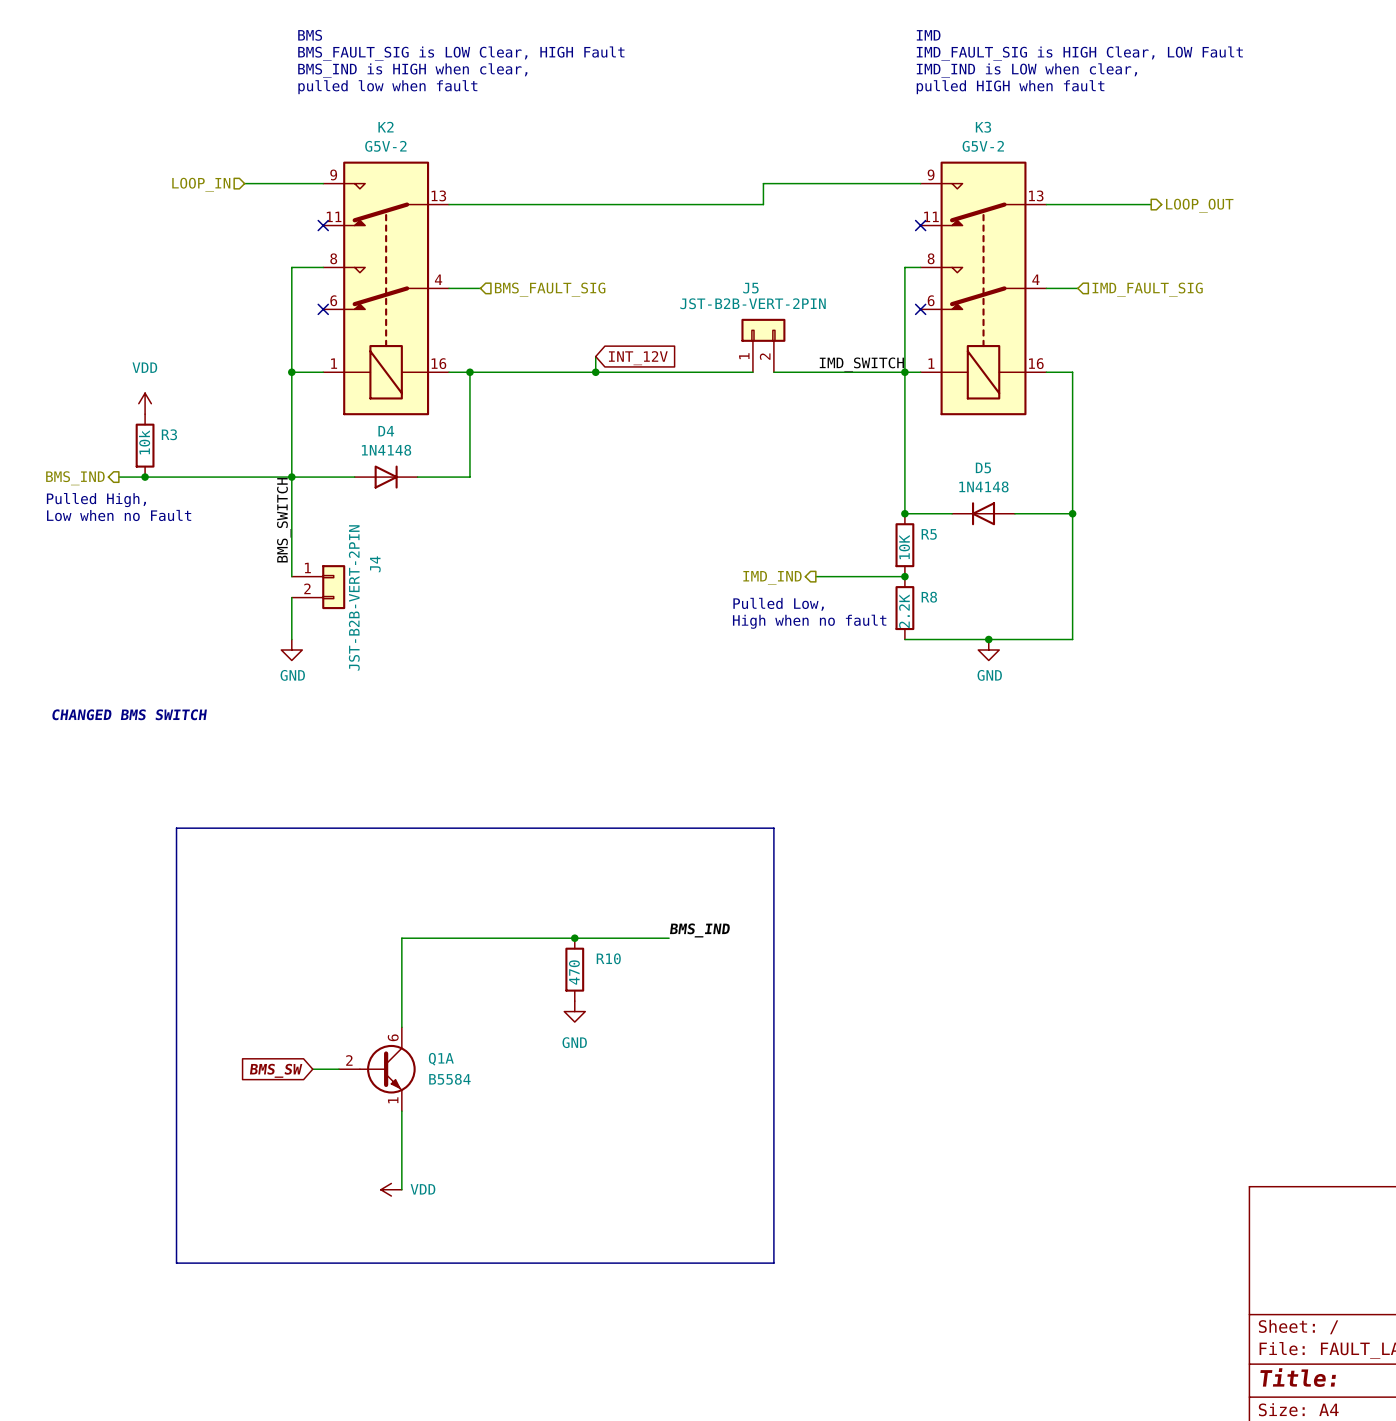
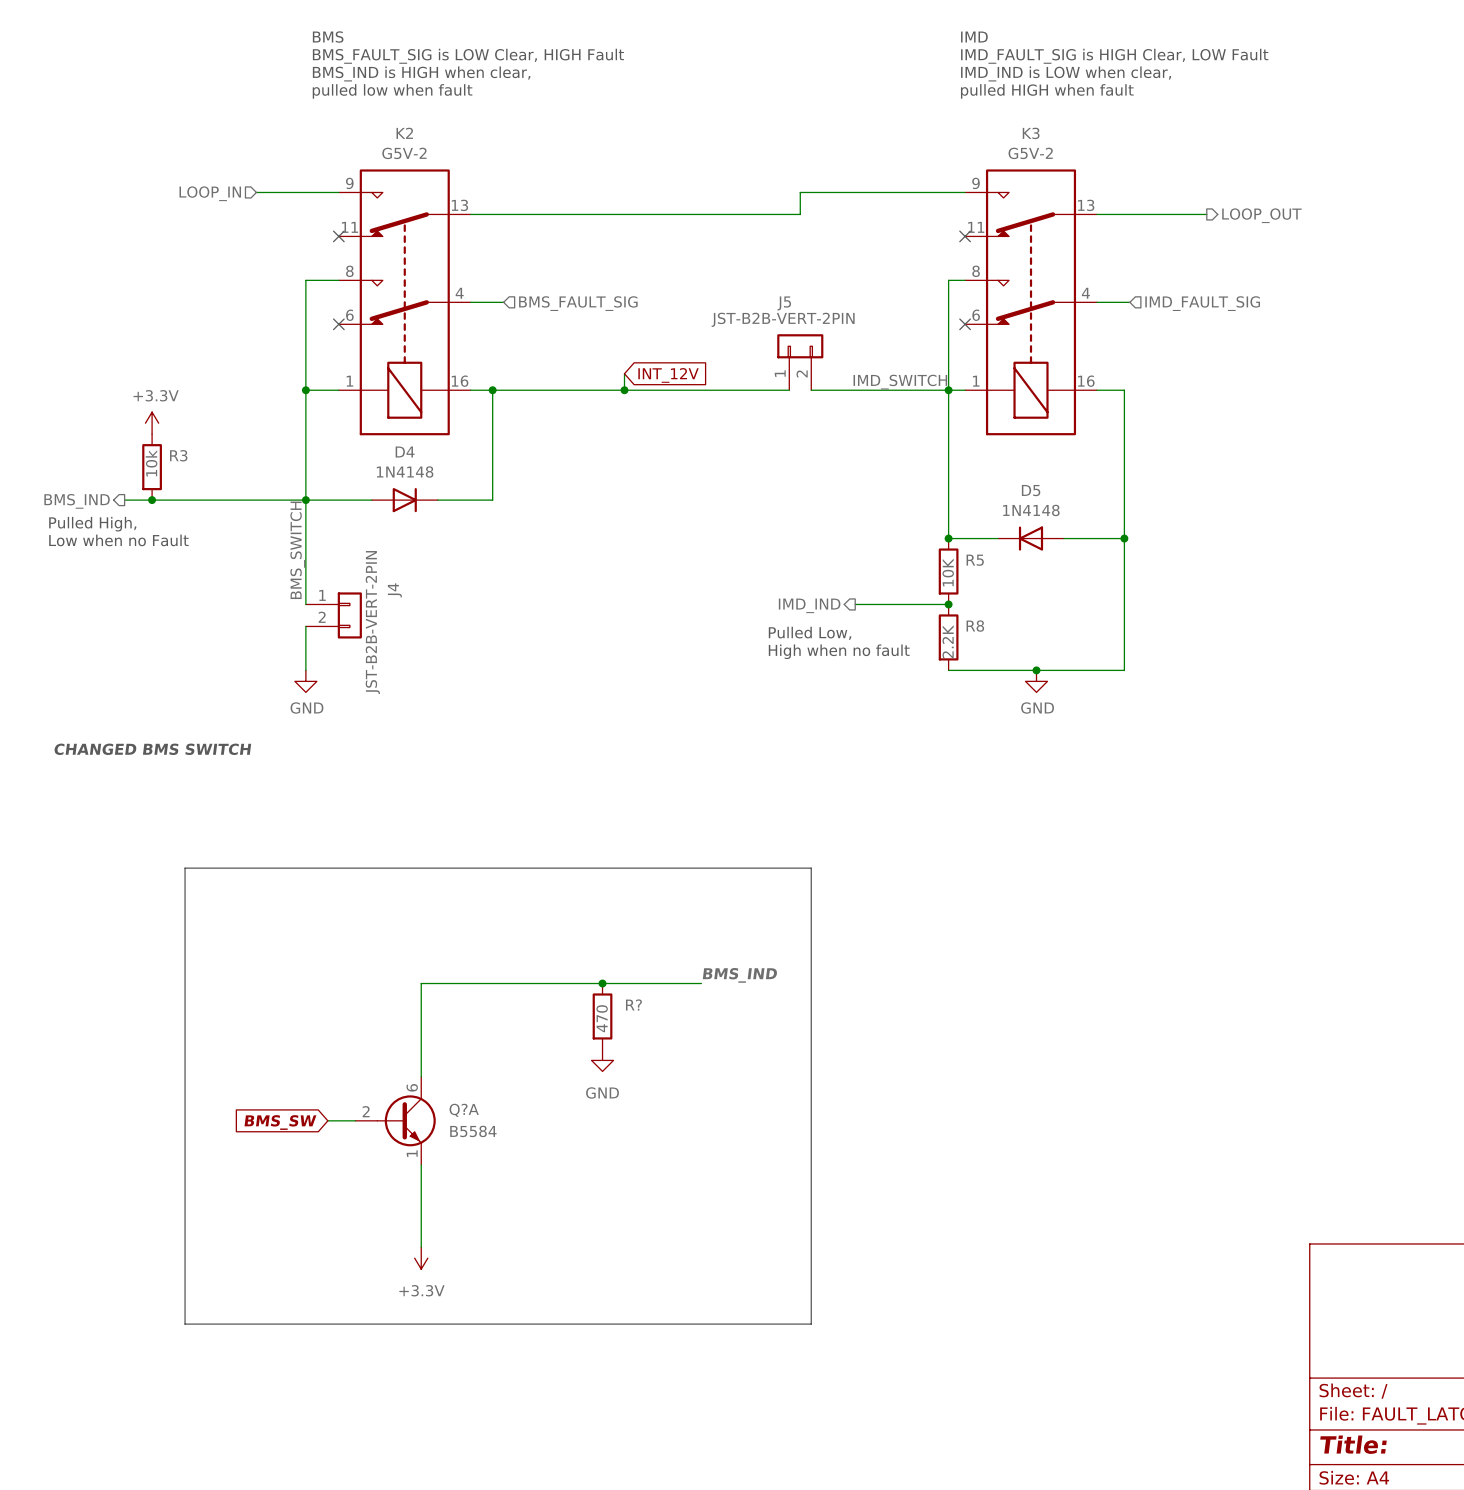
power symbol: VDD (145, 403) -> +3.3V (152, 423)
R10 name: R10 (608, 958) -> R? (633, 1004)
Q1A name: Q1A (441, 1059) -> Q?A (464, 1110)
power symbol: VDD (391, 1189) -> none
power symbol: none -> +3.3V (421, 1258)

